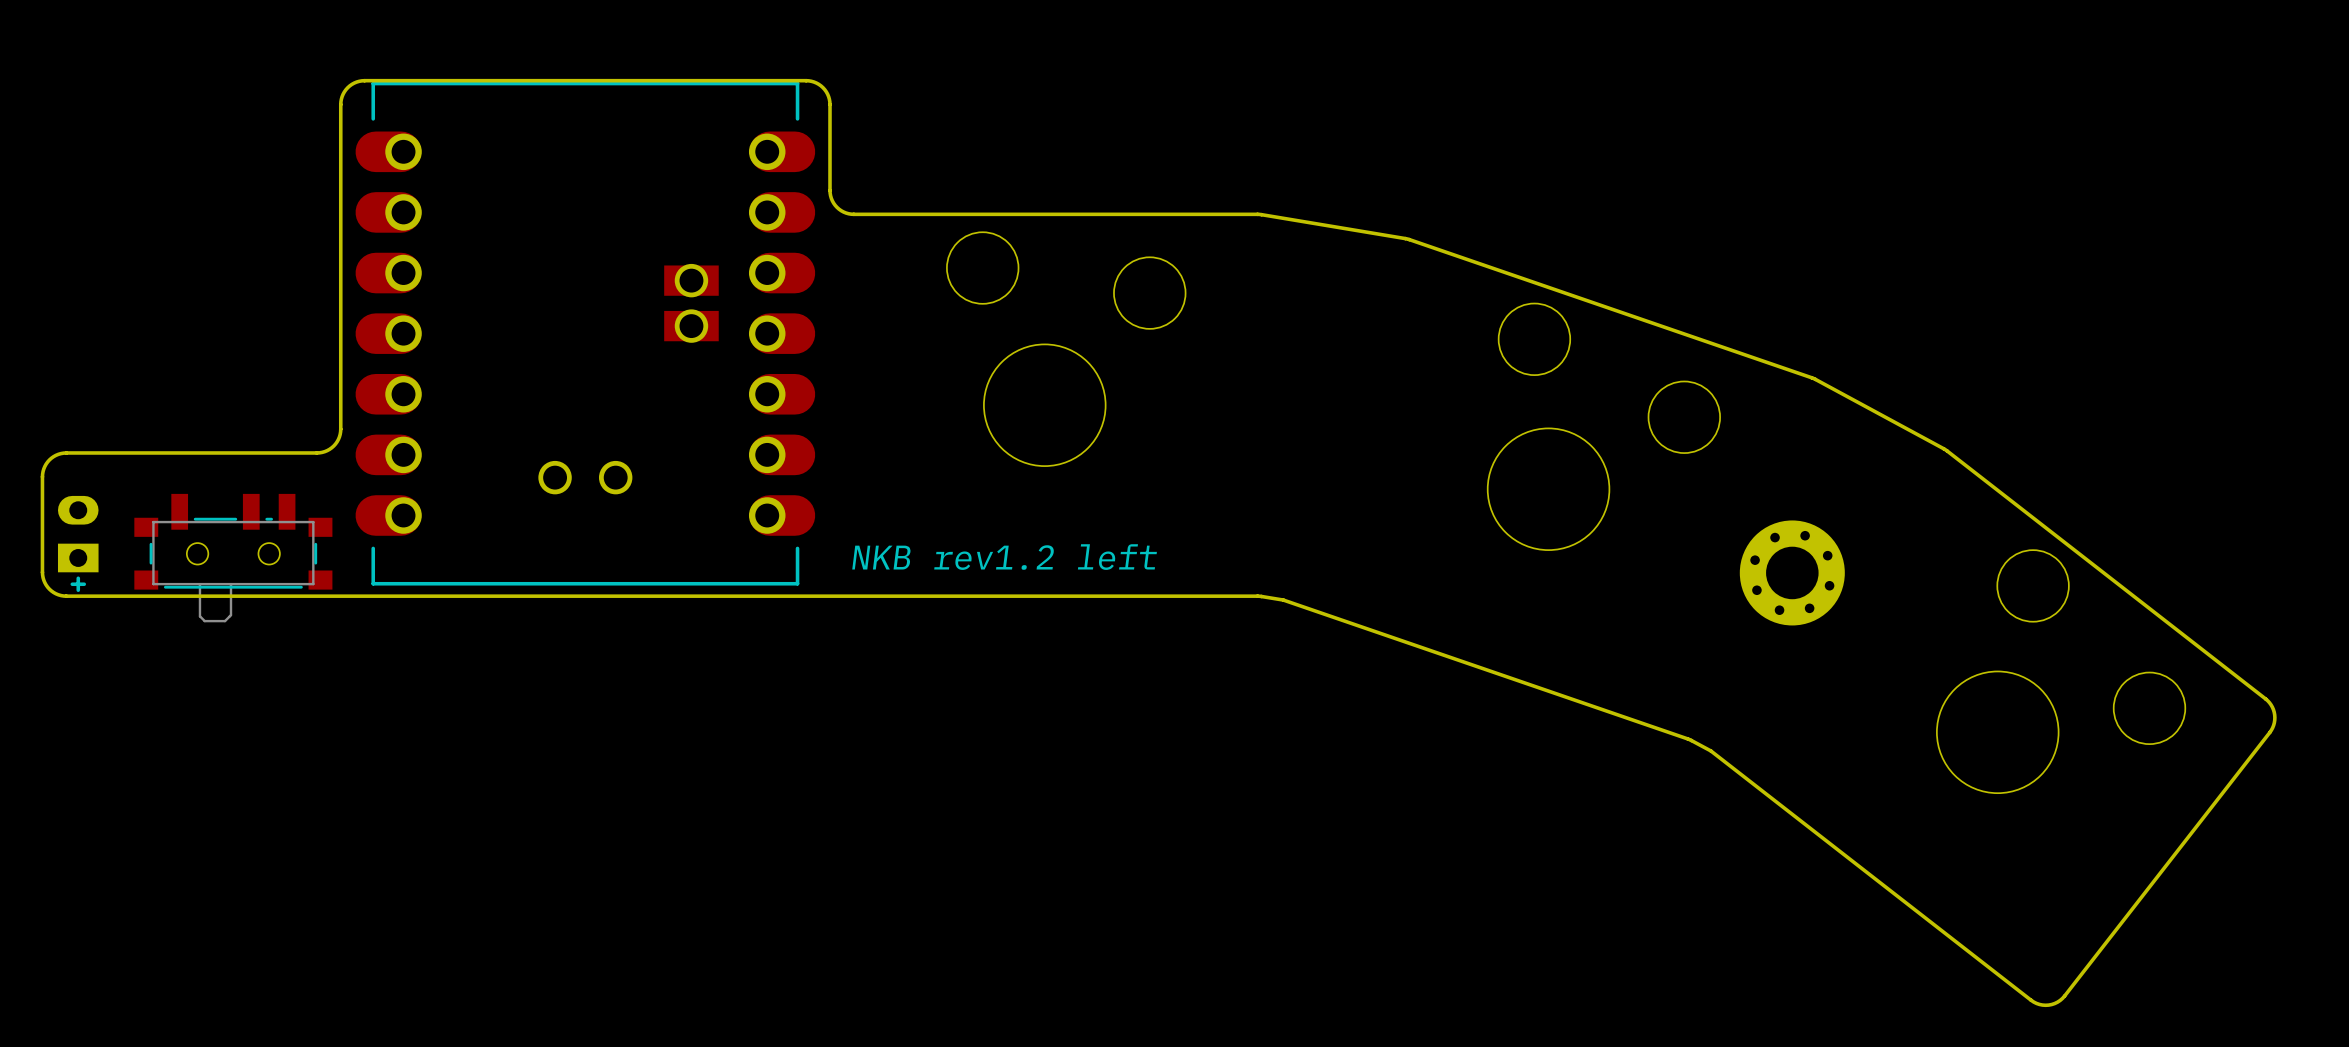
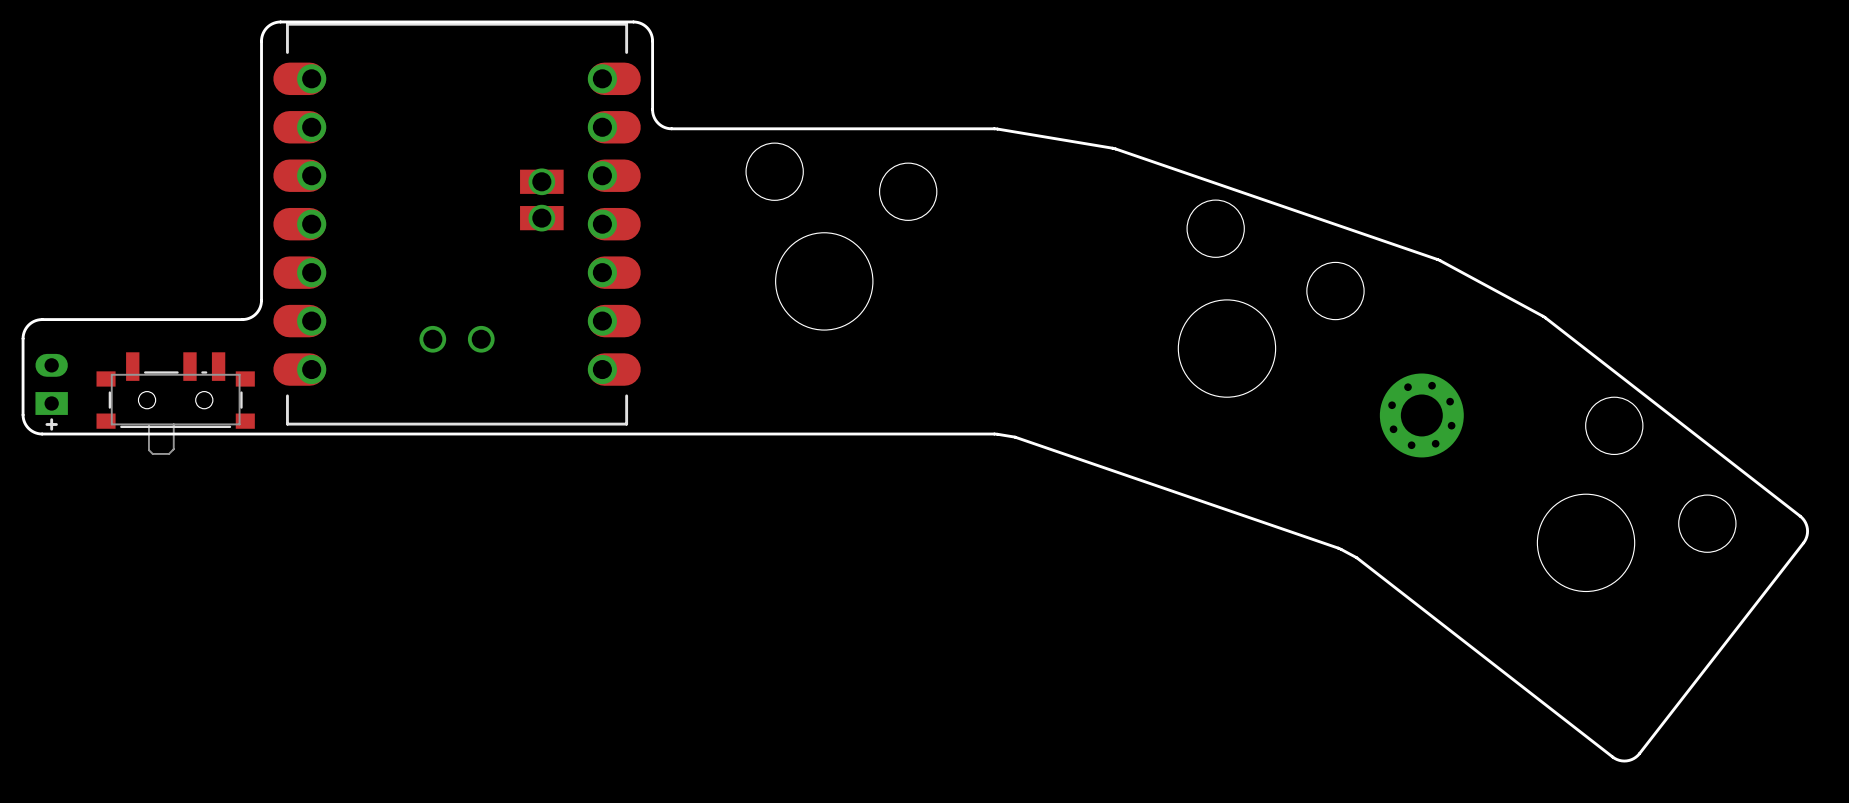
text: NKB rev1.2 left (1004, 557) -> none

